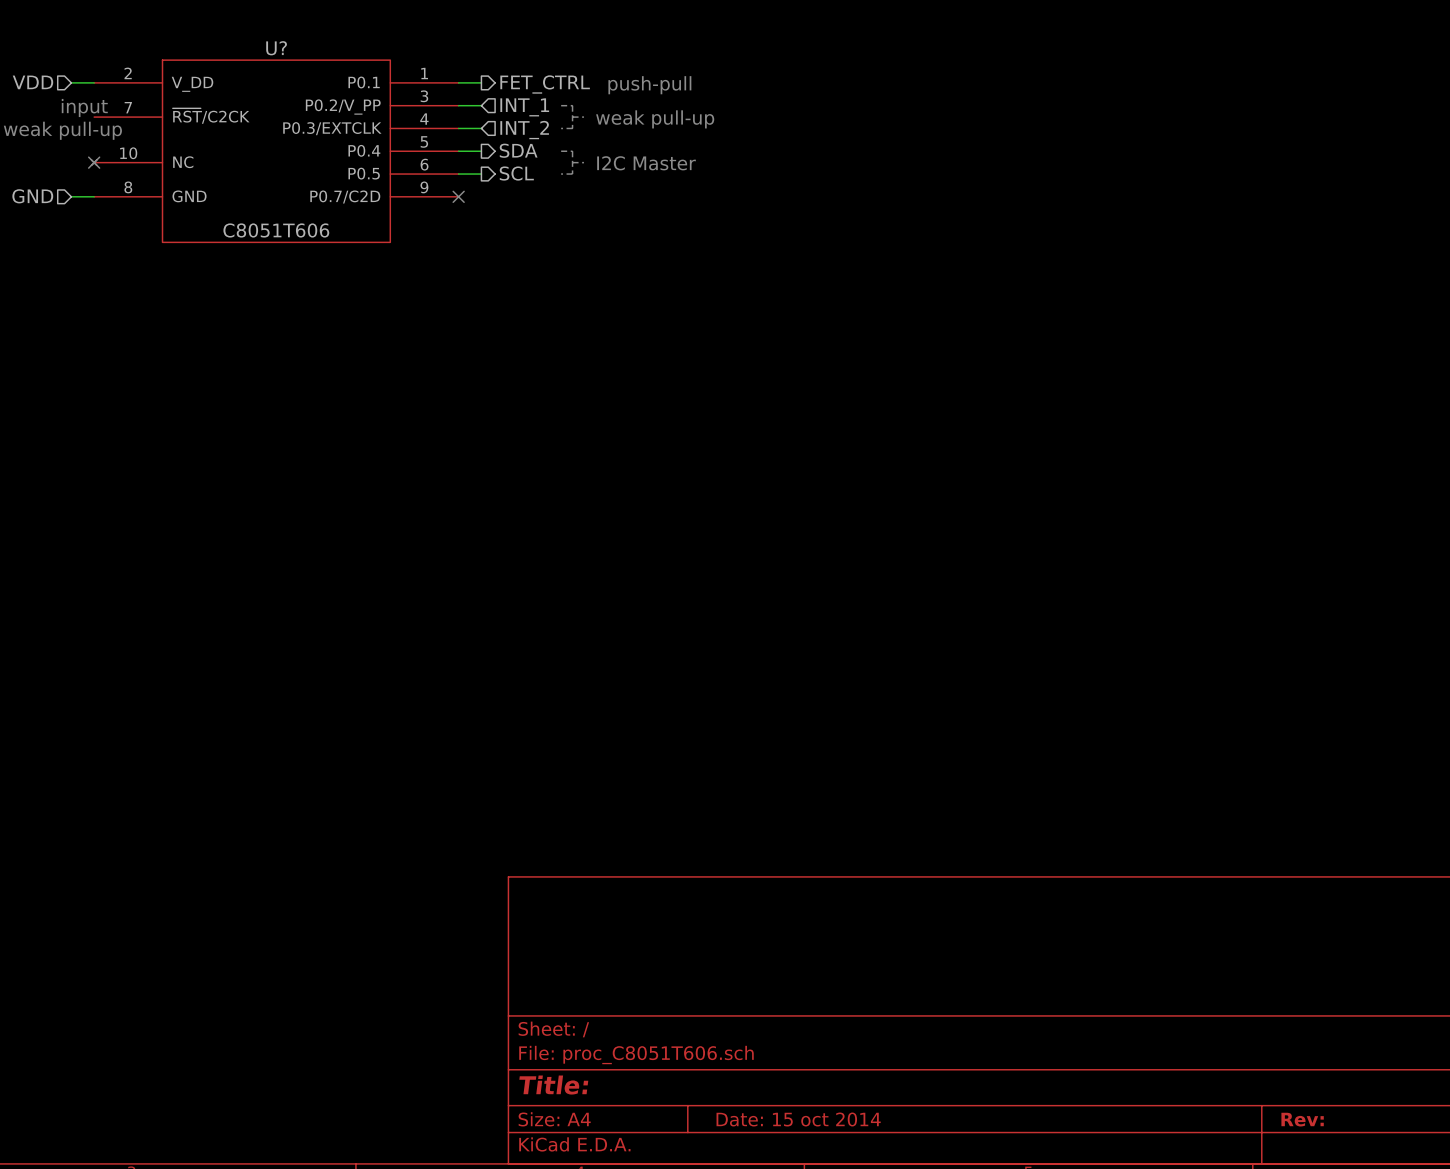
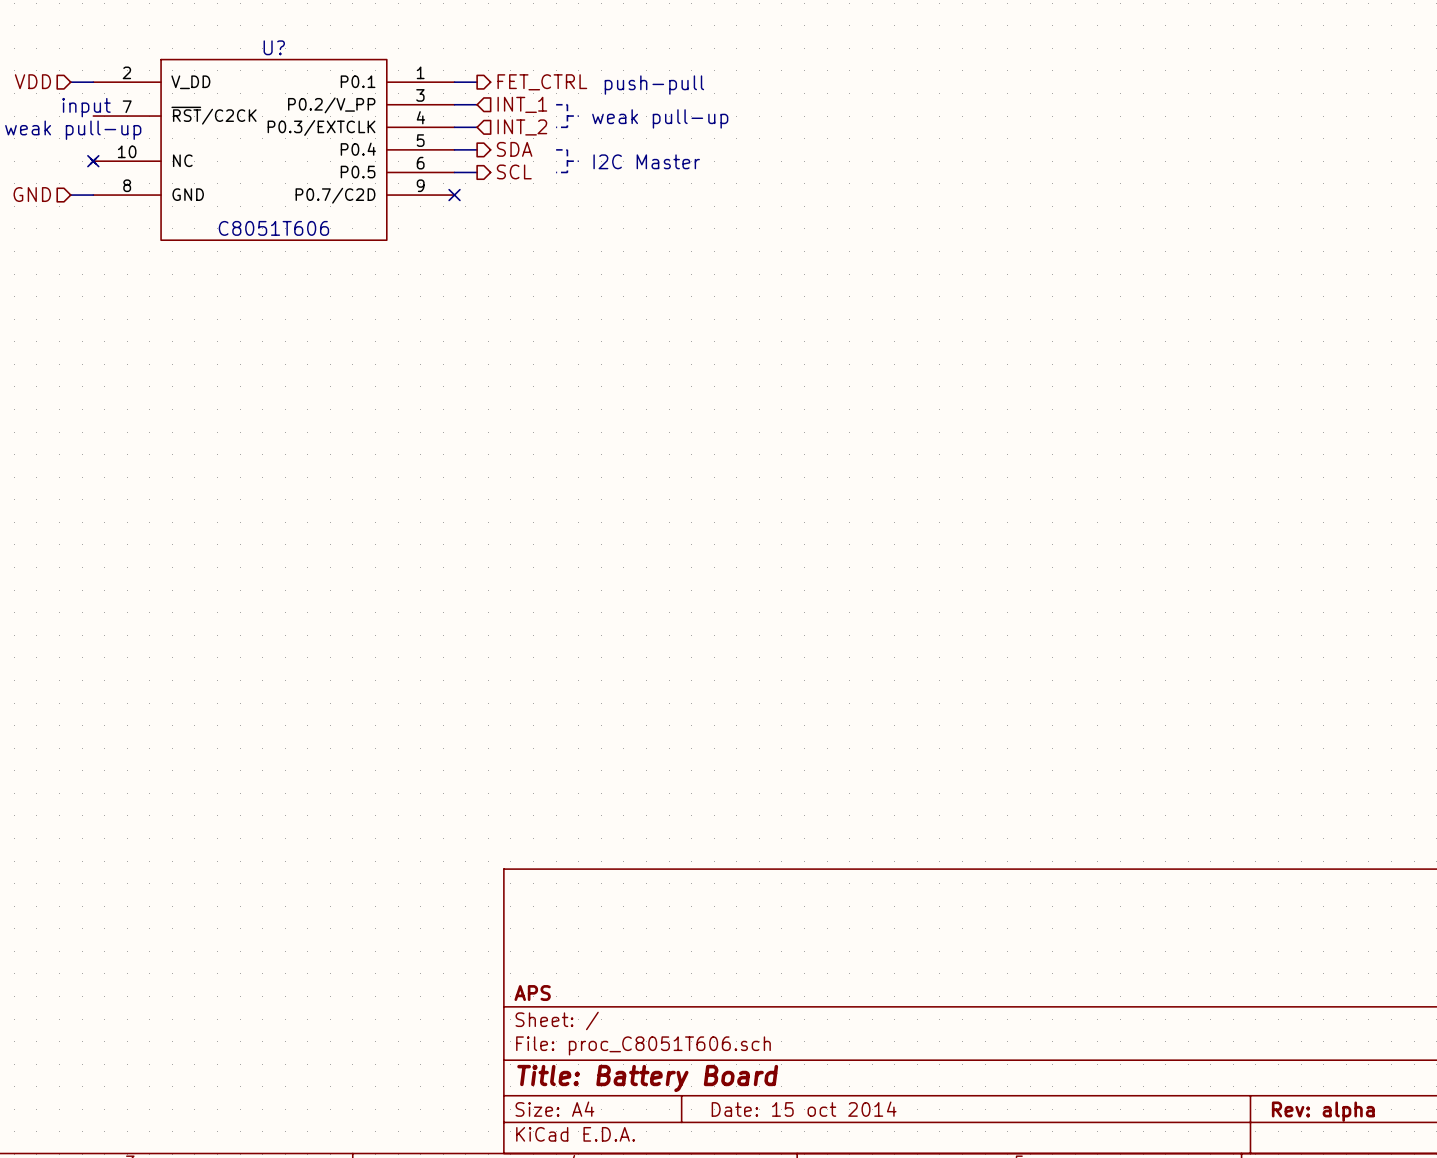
title block: none -> APS (532, 993)
title block: Title: (553, 1085) -> Title: Battery Board (647, 1078)
title block: Rev: (1302, 1119) -> Rev: alpha (1323, 1111)

